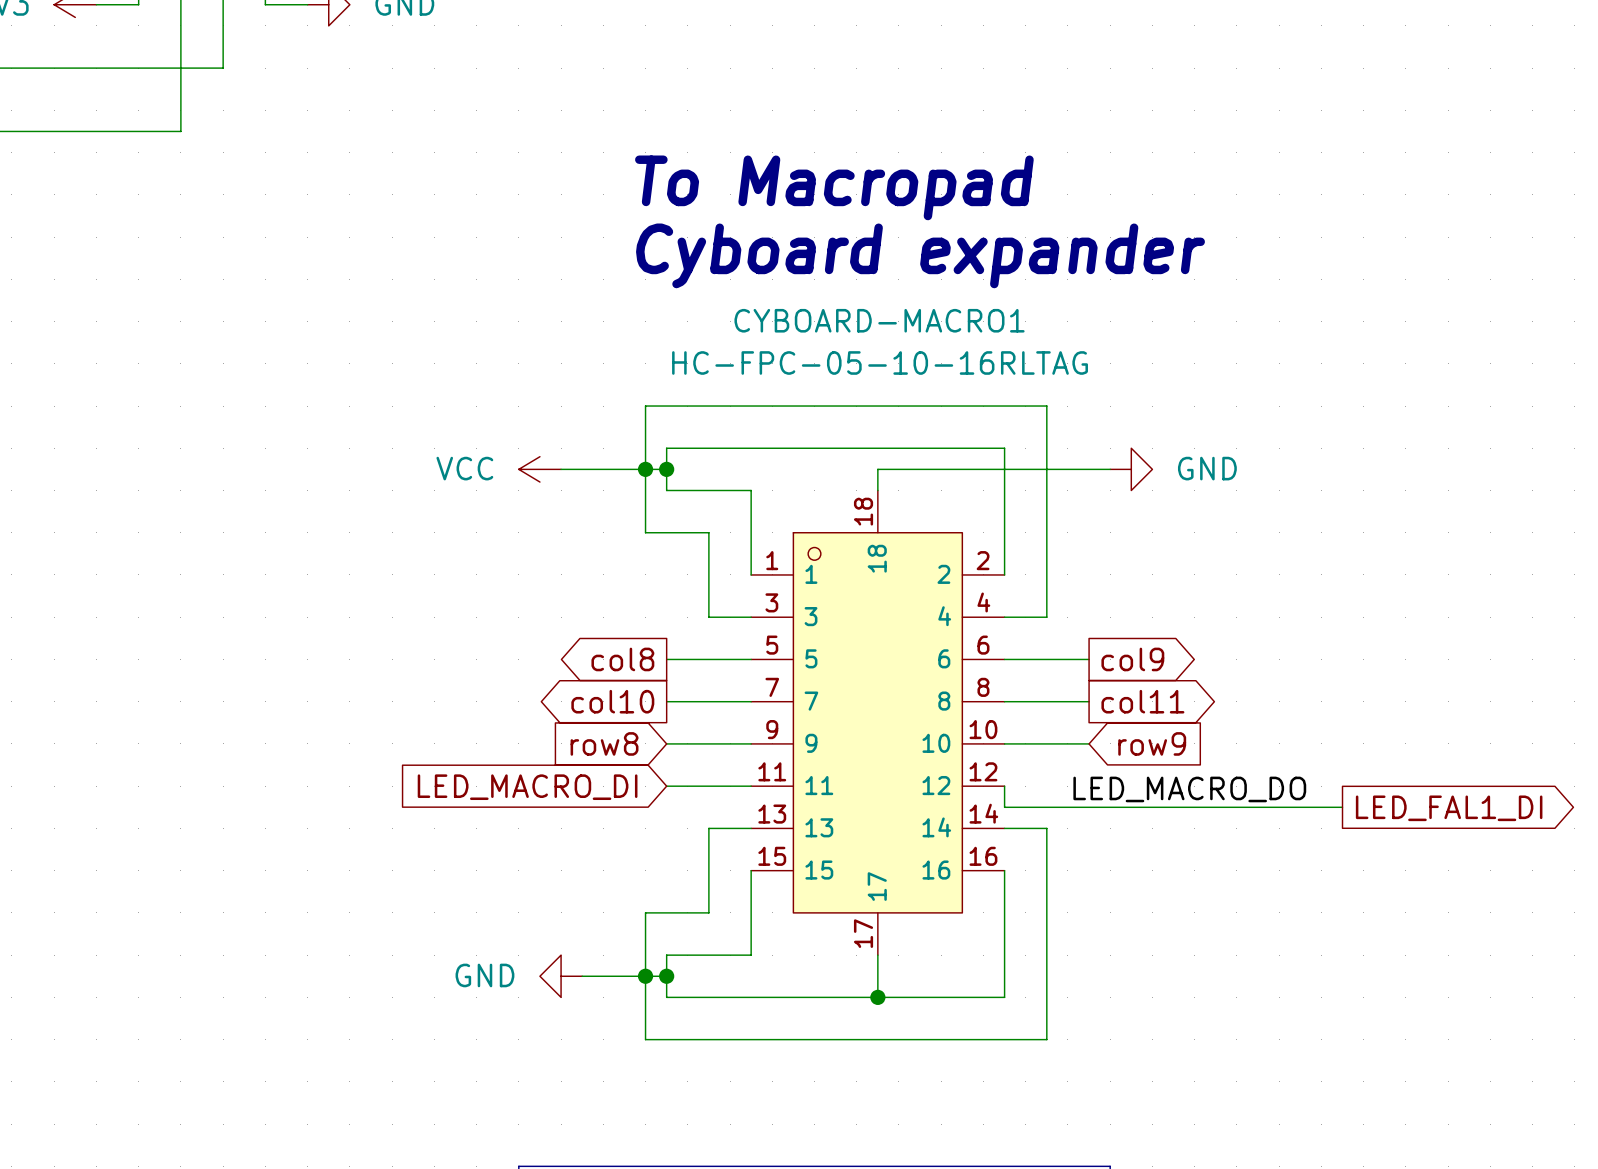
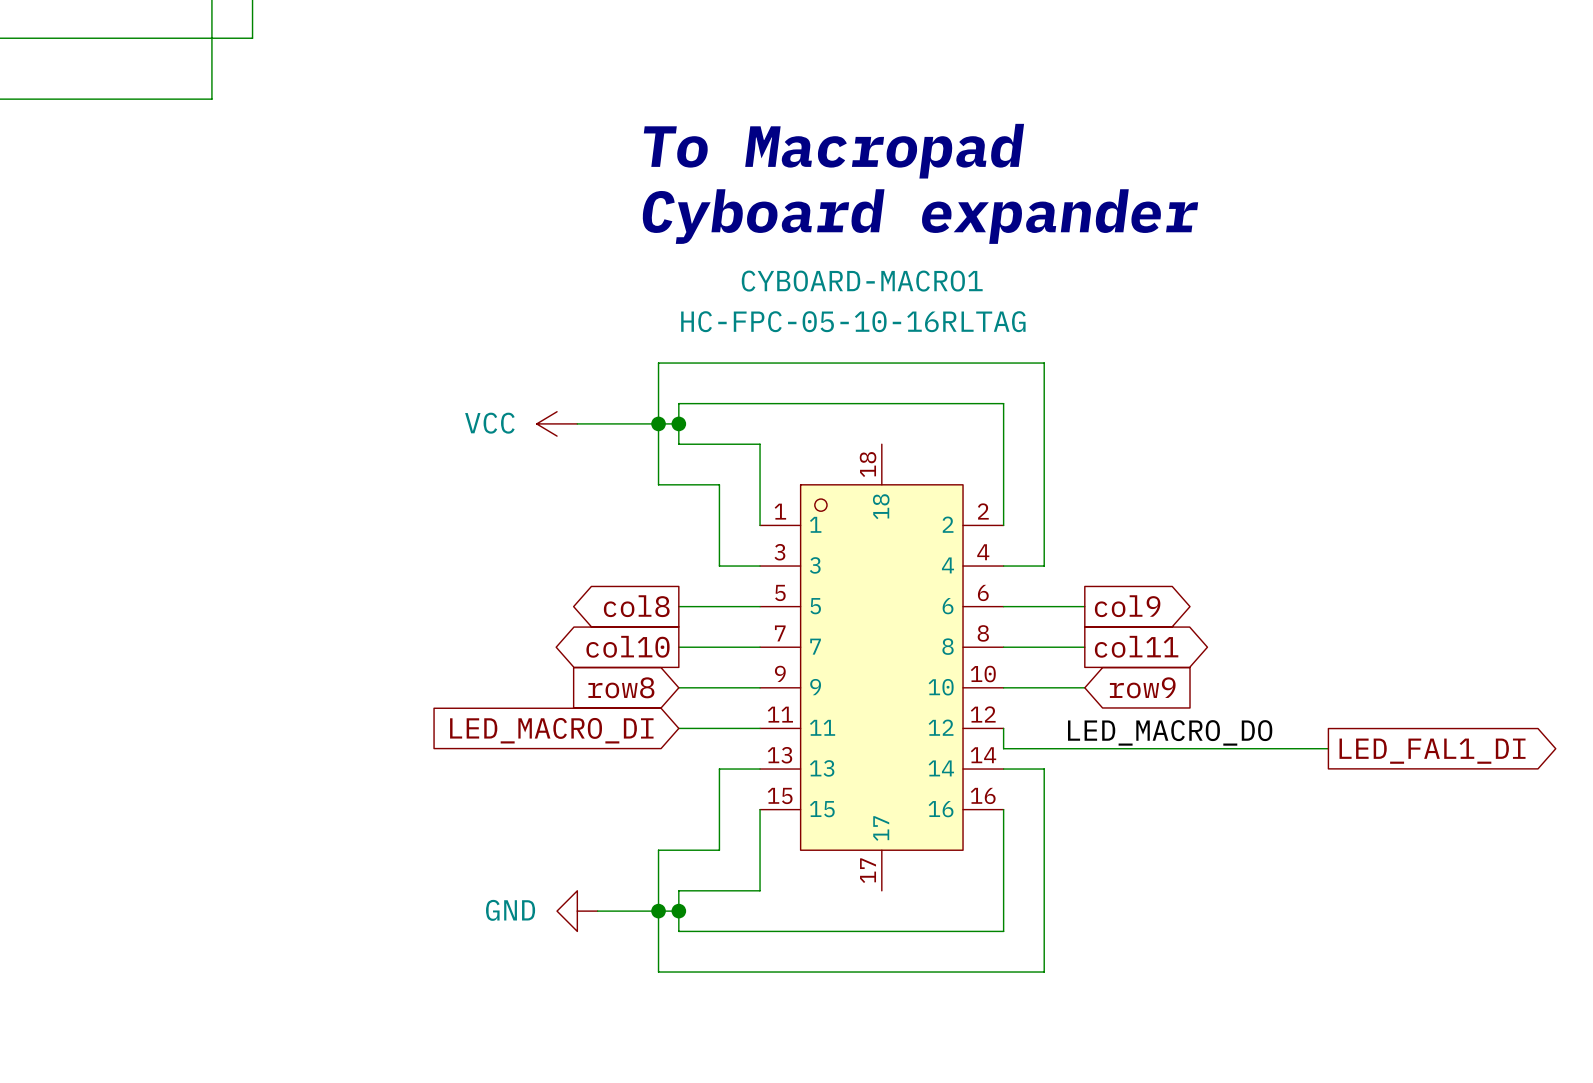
wire: (1110, 469) (877, 469) (877, 490) -> none
power symbol: GND (1131, 469) -> none
wire: (877, 955) (877, 997) -> none
junction: (877, 997) -> none

